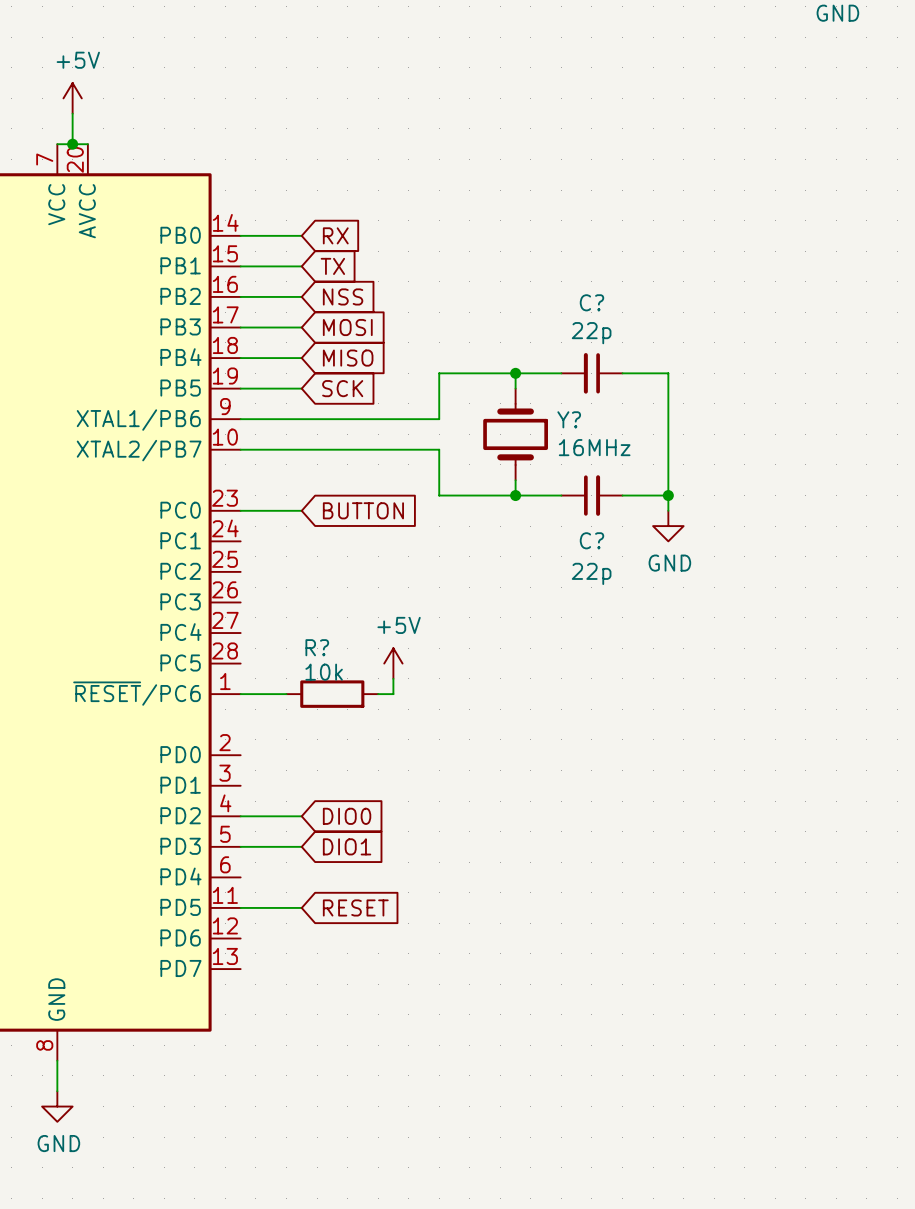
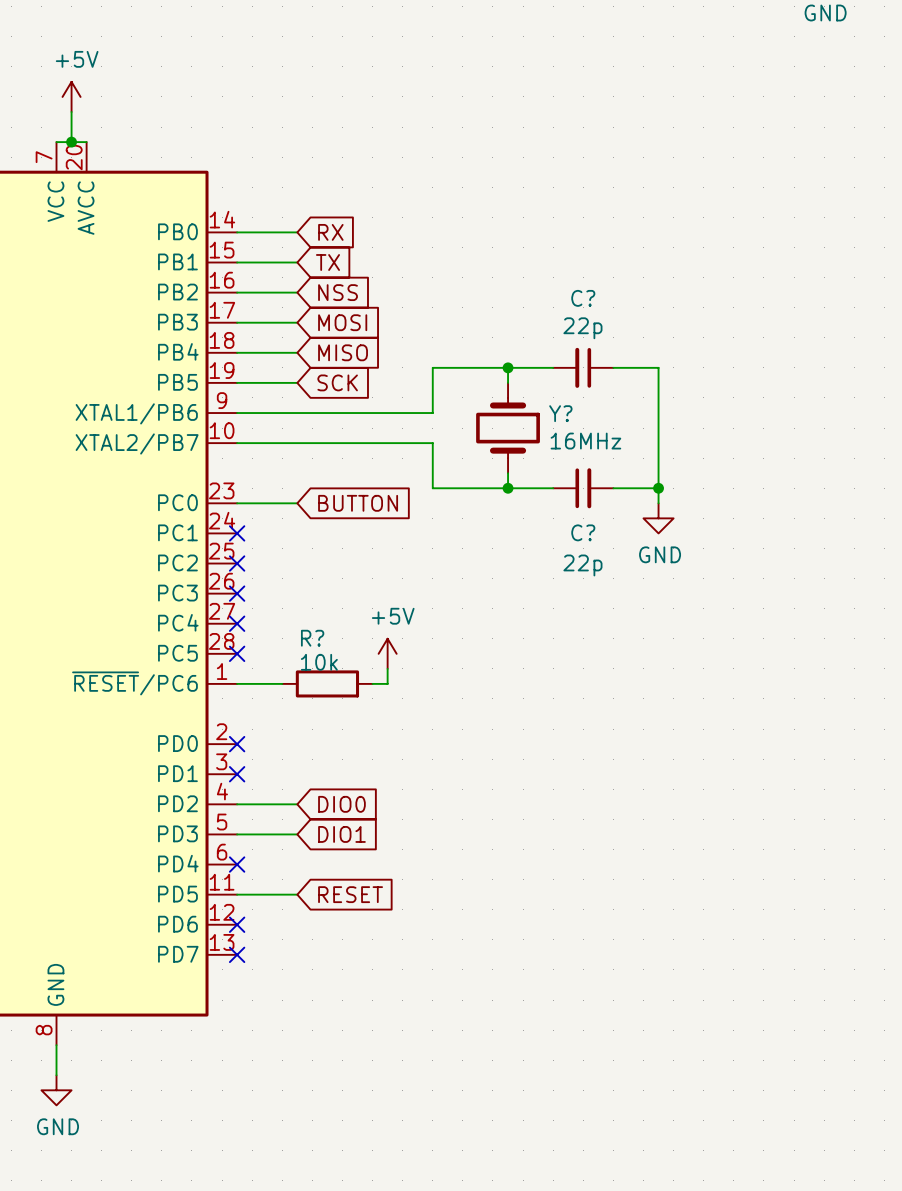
no-connect mark: none -> (237, 533)
no-connect mark: none -> (237, 563)
no-connect mark: none -> (237, 593)
no-connect mark: none -> (237, 623)
no-connect mark: none -> (237, 653)
no-connect mark: none -> (237, 744)
no-connect mark: none -> (237, 774)
no-connect mark: none -> (237, 864)
no-connect mark: none -> (237, 924)
no-connect mark: none -> (237, 954)

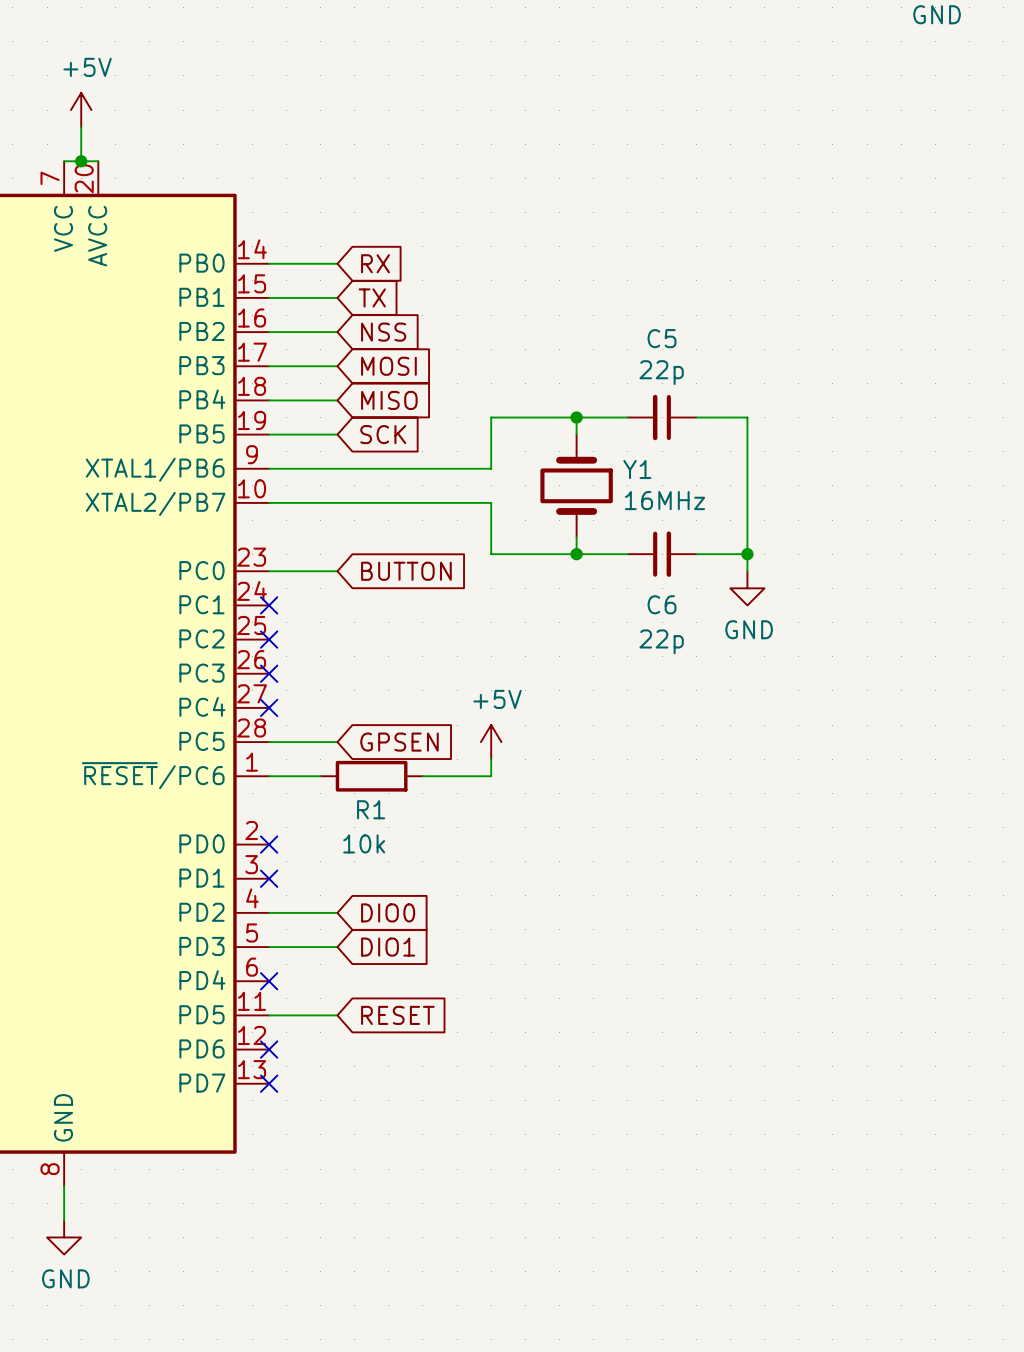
C? name: C? (583, 298) -> C5 (662, 338)
Y? name: Y? (560, 413) -> Y1 (637, 469)
C? name: C? (583, 532) -> C6 (662, 604)
R? name: R? (312, 638) -> R1 (371, 809)
wire: none -> (269, 742) (337, 742)
no-connect mark: (237, 653) -> none
global label: none -> GPSEN (399, 742)
power symbol position: +5V (387, 653) -> +5V (491, 742)
R? value position: 10k (319, 662) -> 10k (364, 843)
wire: (387, 668) (387, 683) -> (491, 759) (491, 776) (439, 776)

